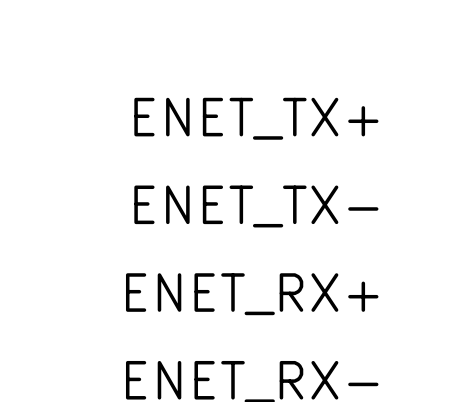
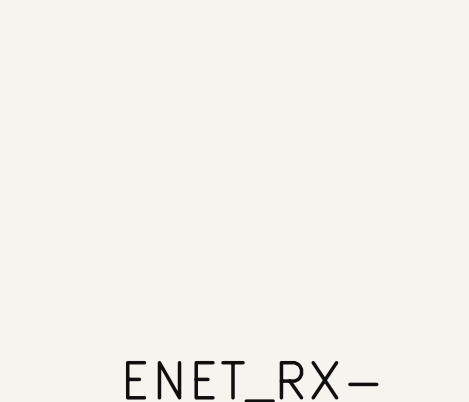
label: ENET_TX+ (256, 118) -> none
label: ENET_TX- (256, 206) -> none
label: ENET_RX+ (252, 294) -> none

